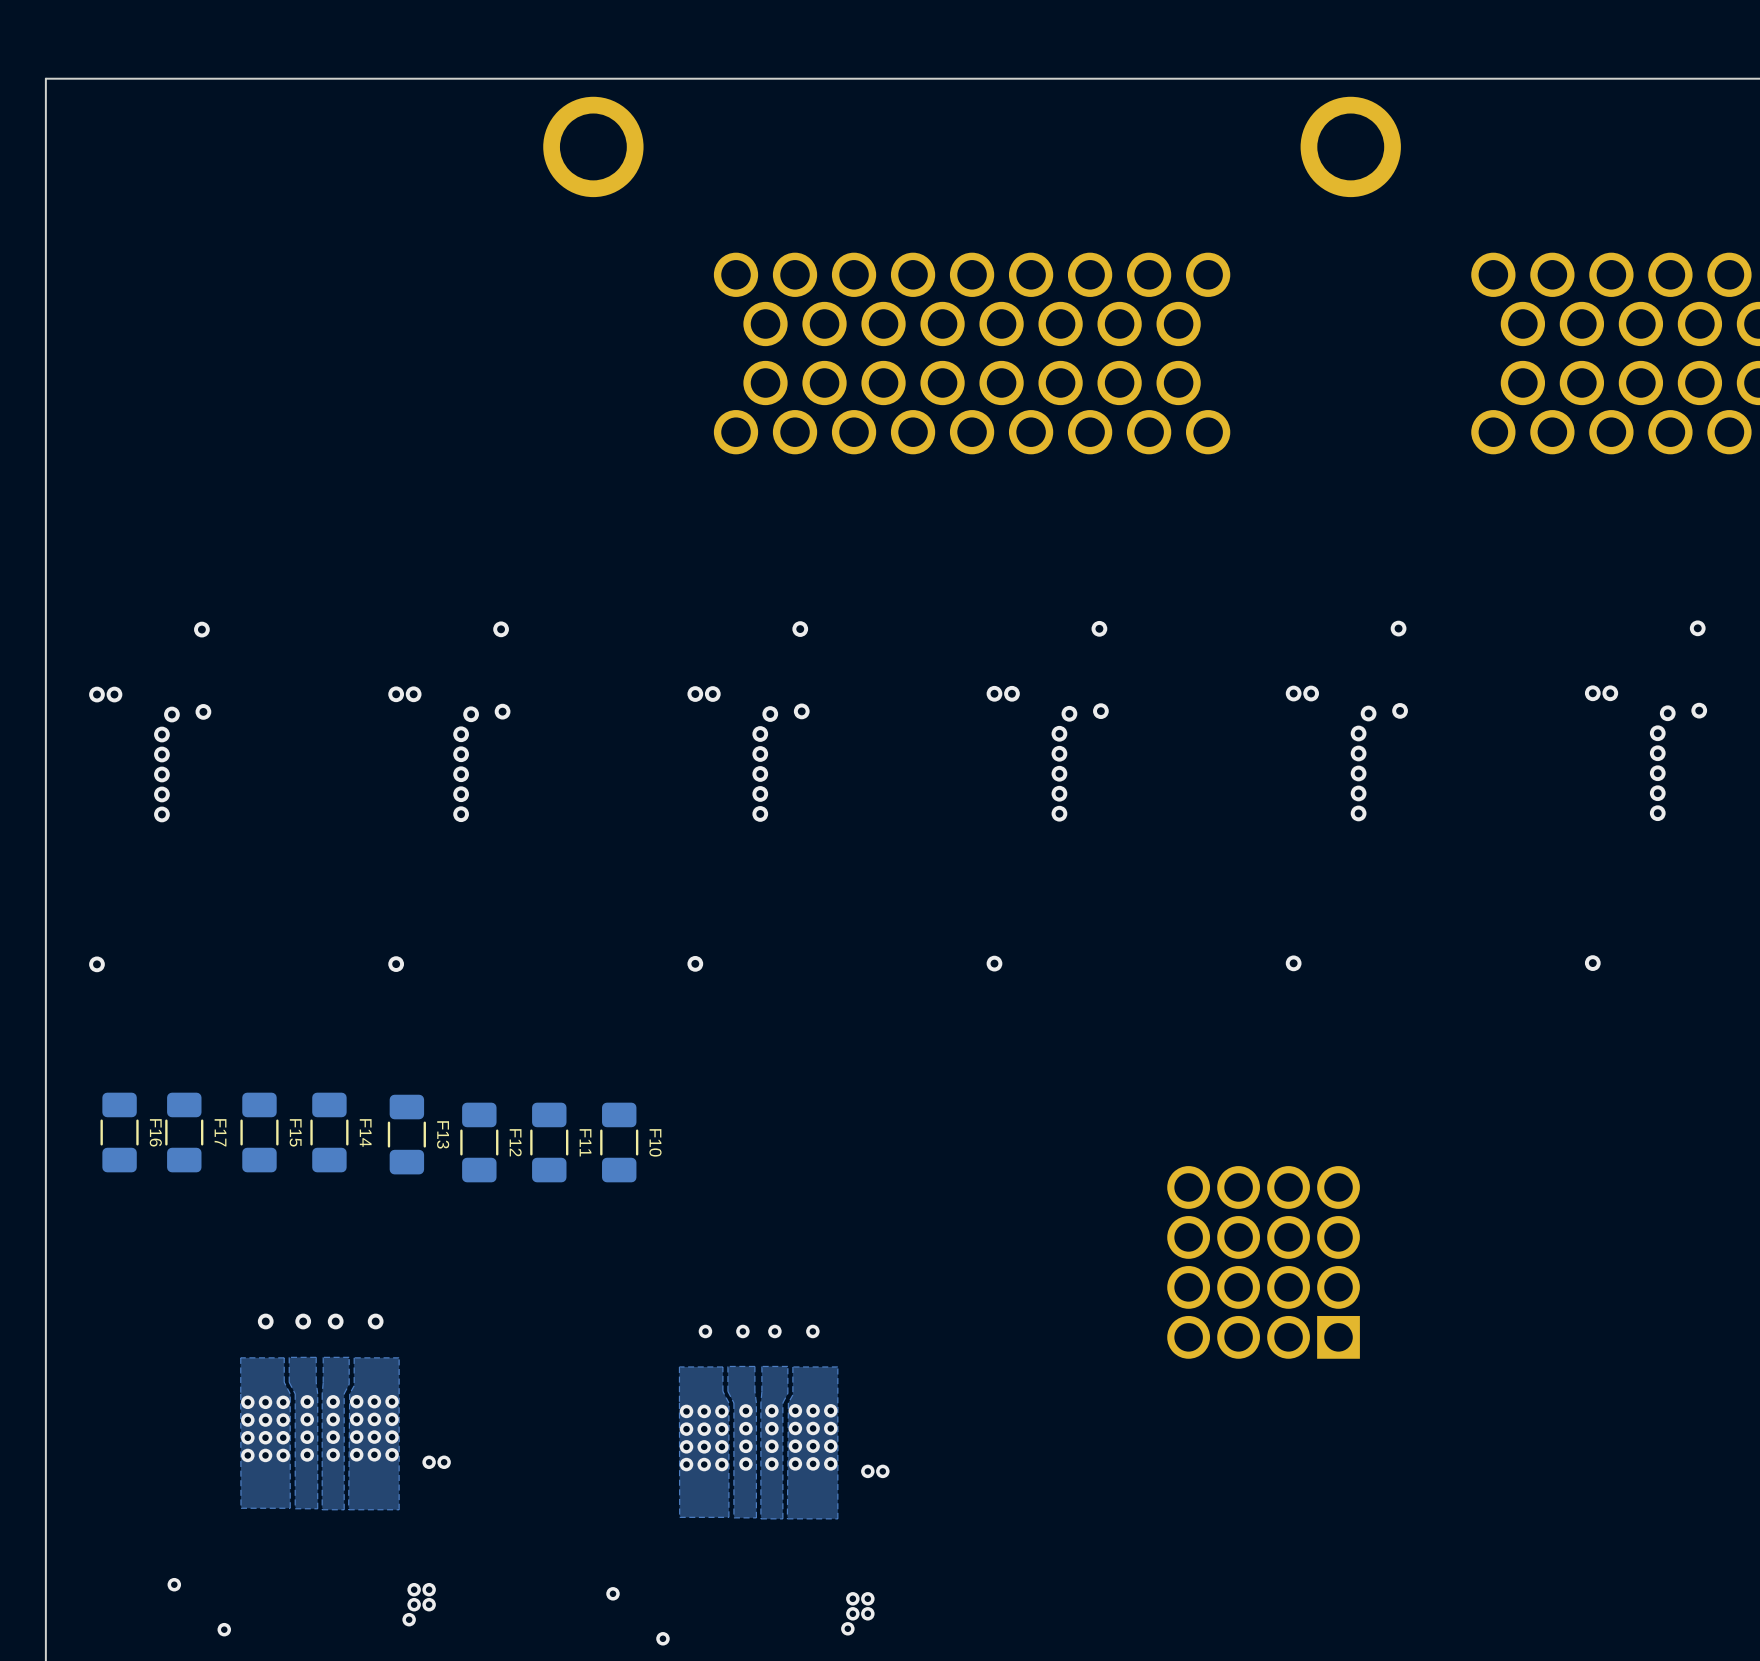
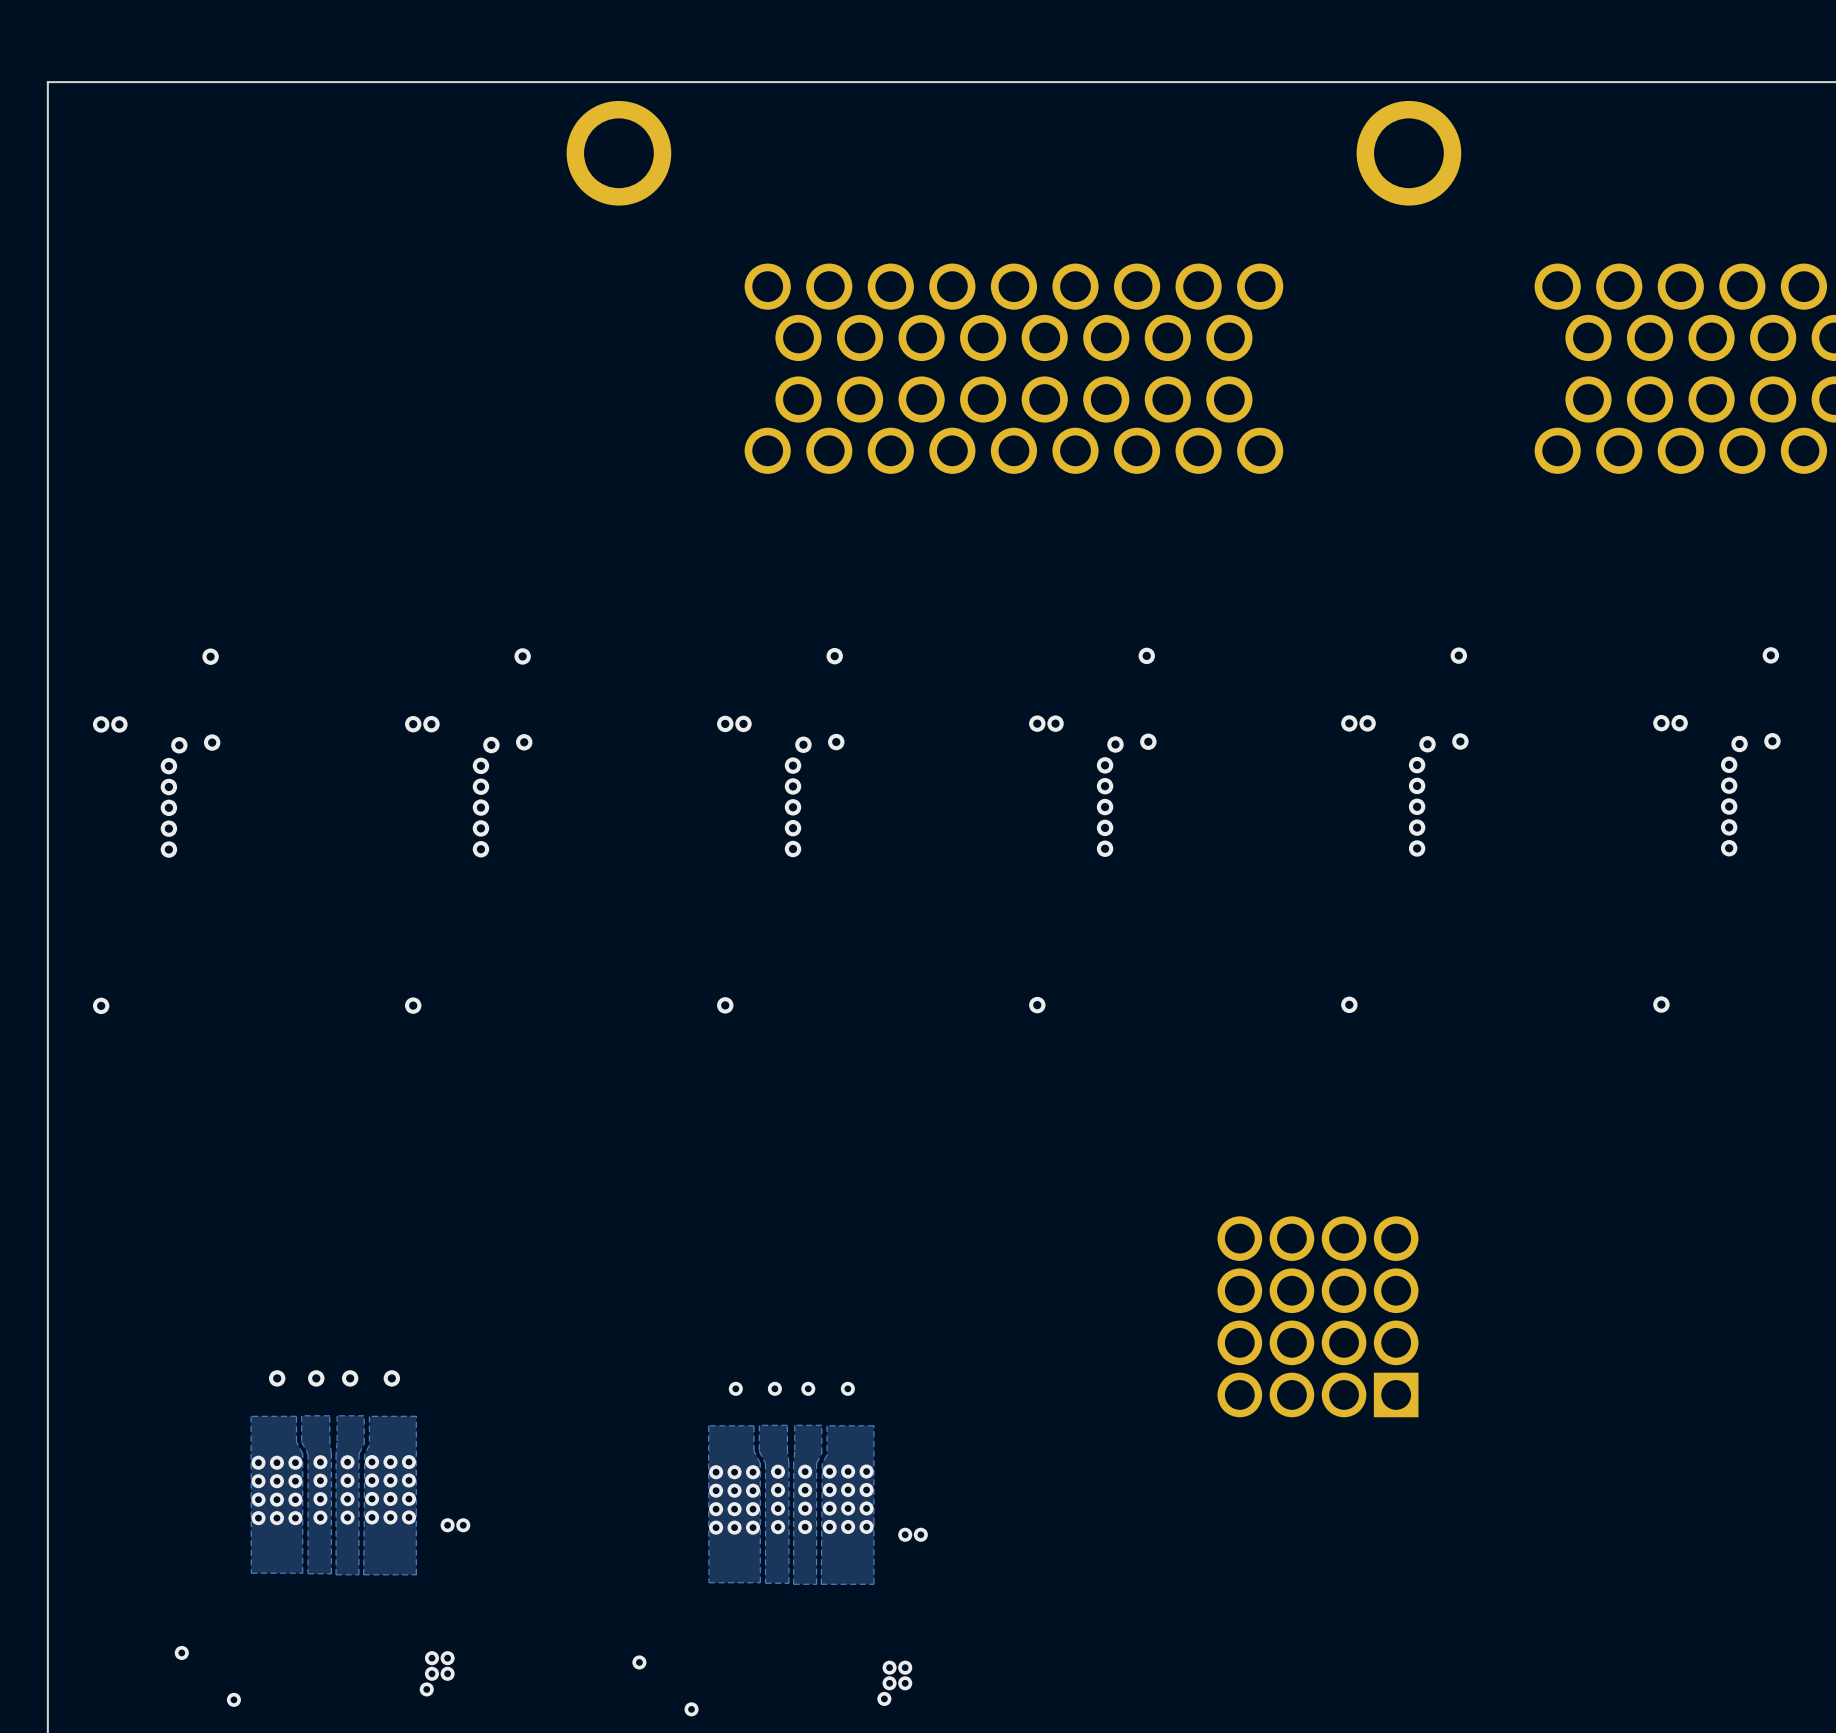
F16: (119, 1132) -> none
F17: (184, 1132) -> none
F15: (259, 1132) -> none
F14: (329, 1132) -> none
F13: (406, 1134) -> none
F12: (479, 1142) -> none
F11: (549, 1142) -> none
F10: (619, 1142) -> none

